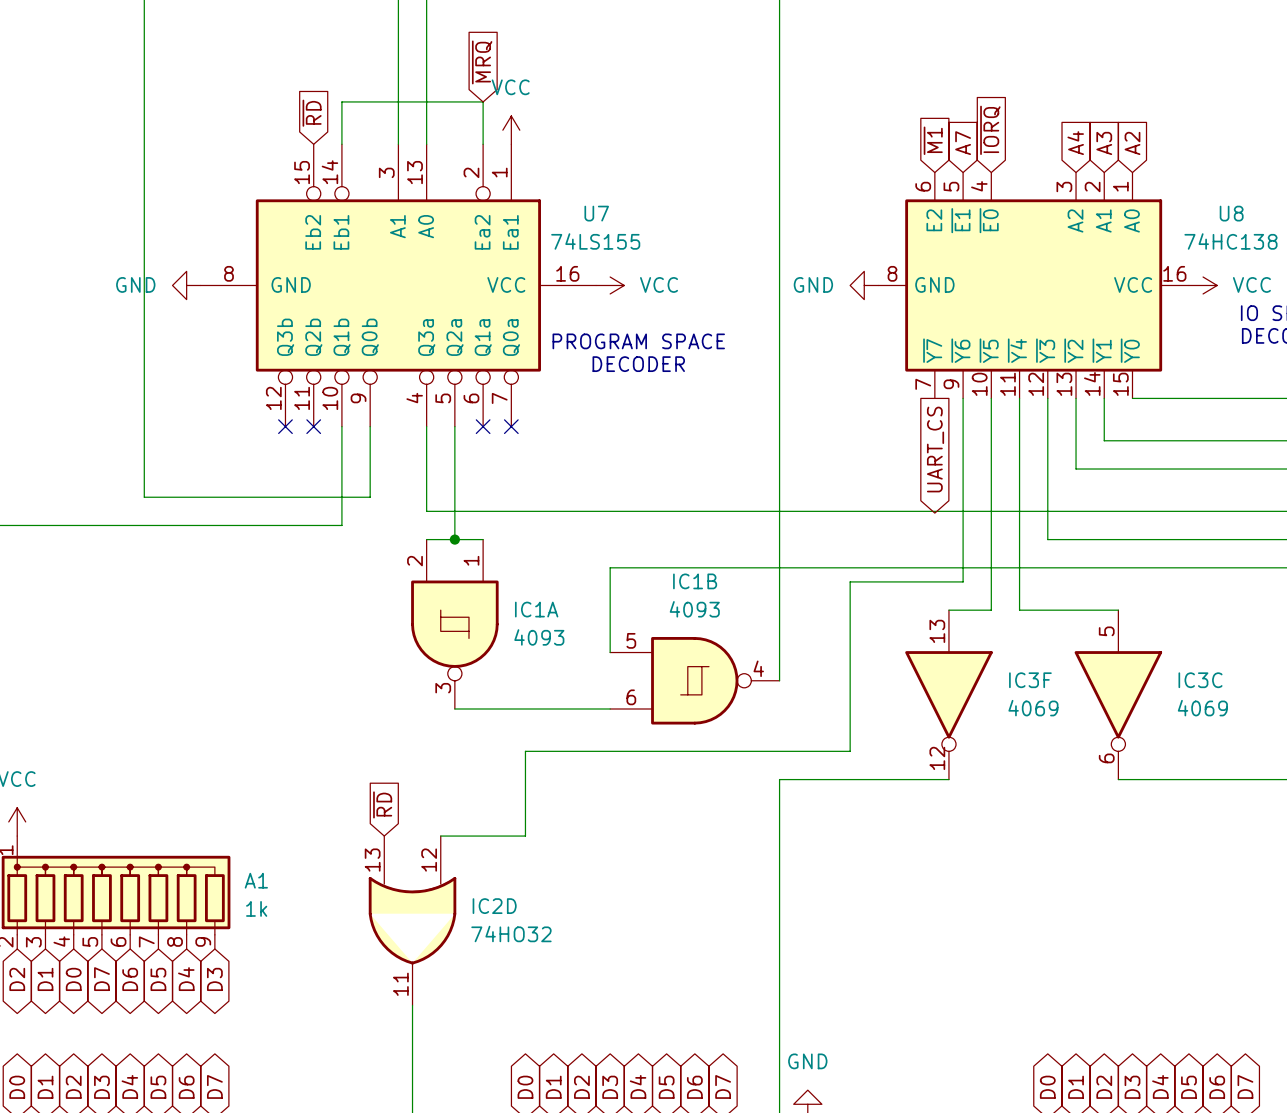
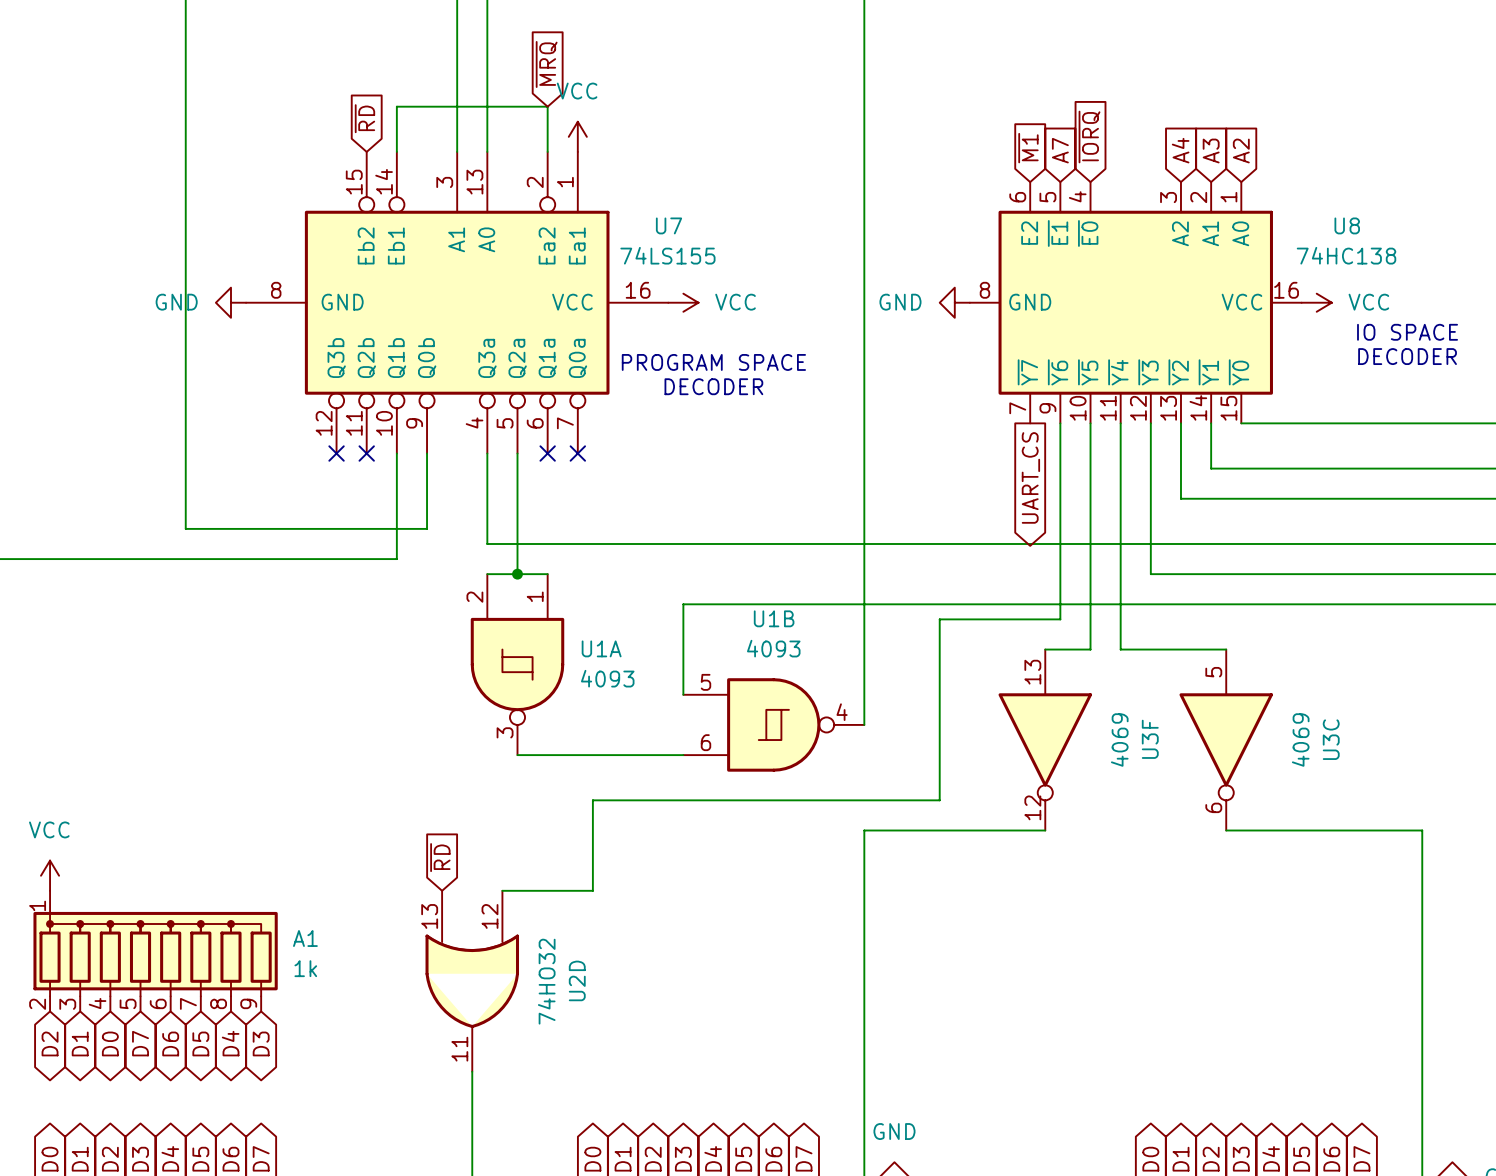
IC1B name: IC1B (695, 581) -> U1B (774, 618)
IC1A name: IC1A (536, 609) -> U1A (601, 648)
IC3F name: IC3F (1030, 680) -> U3F (1150, 739)
IC3C name: IC3C (1200, 680) -> U3C (1331, 739)
IC3F value rotation: 0° (1033, 708) -> 90° counterclockwise (1119, 740)
IC3C value rotation: 0° (1202, 708) -> 90° counterclockwise (1300, 740)
IC2D name: IC2D (494, 906) -> U2D (577, 980)
IC2D value rotation: 0° (511, 934) -> 90° counterclockwise (546, 981)

